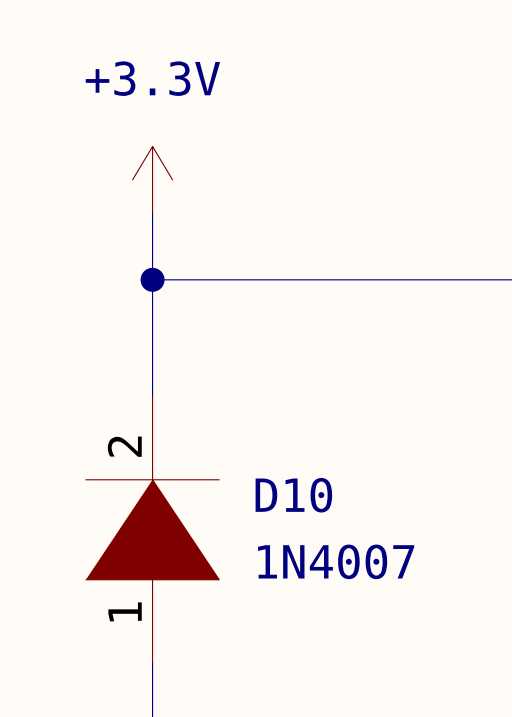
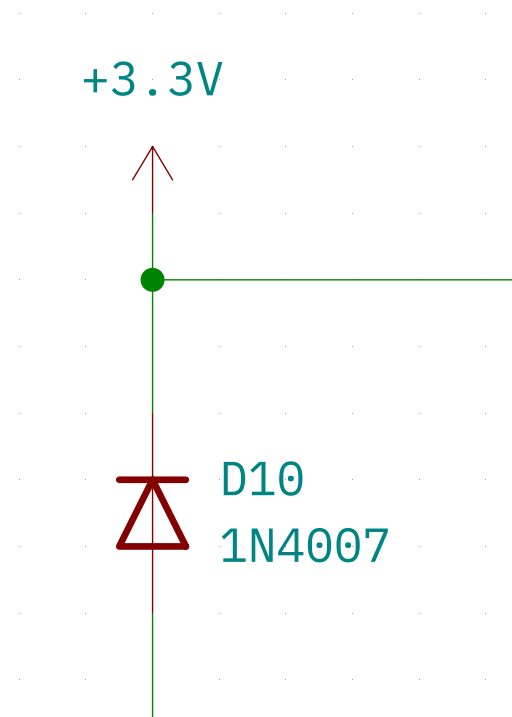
D10 symbol: [85, 396, 220, 664] -> [115, 413, 190, 614]

